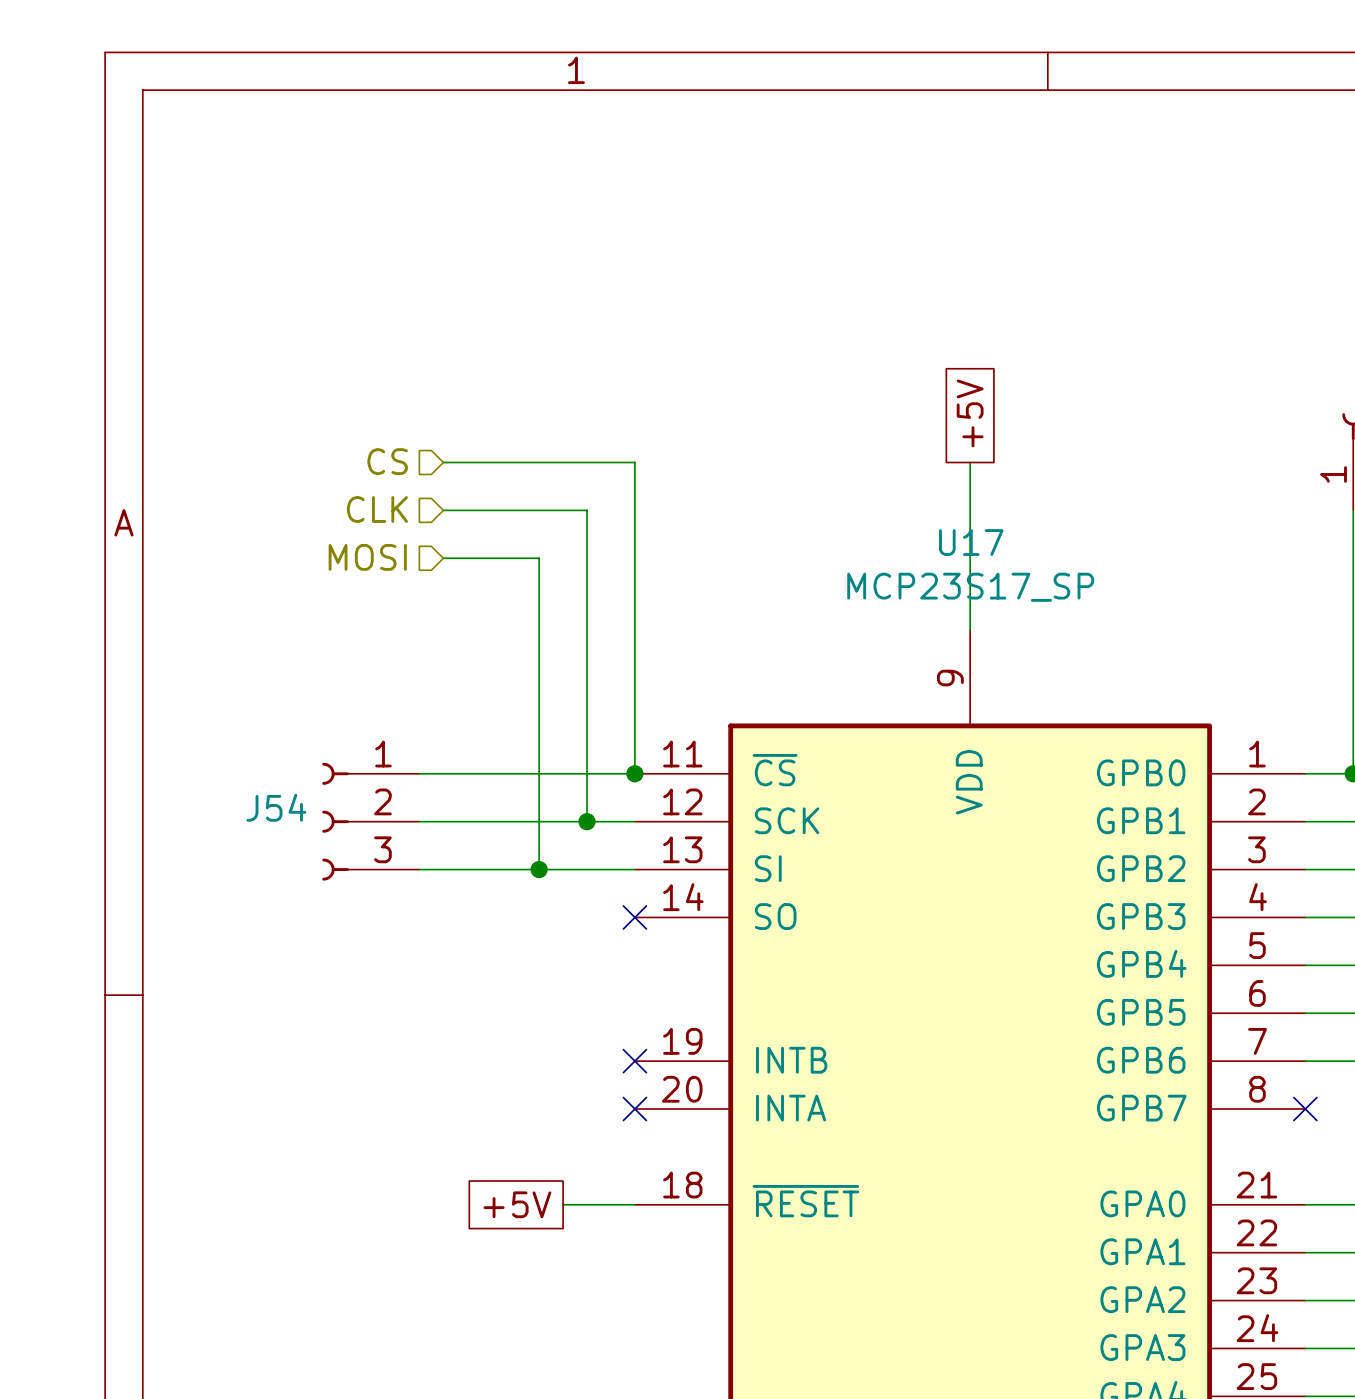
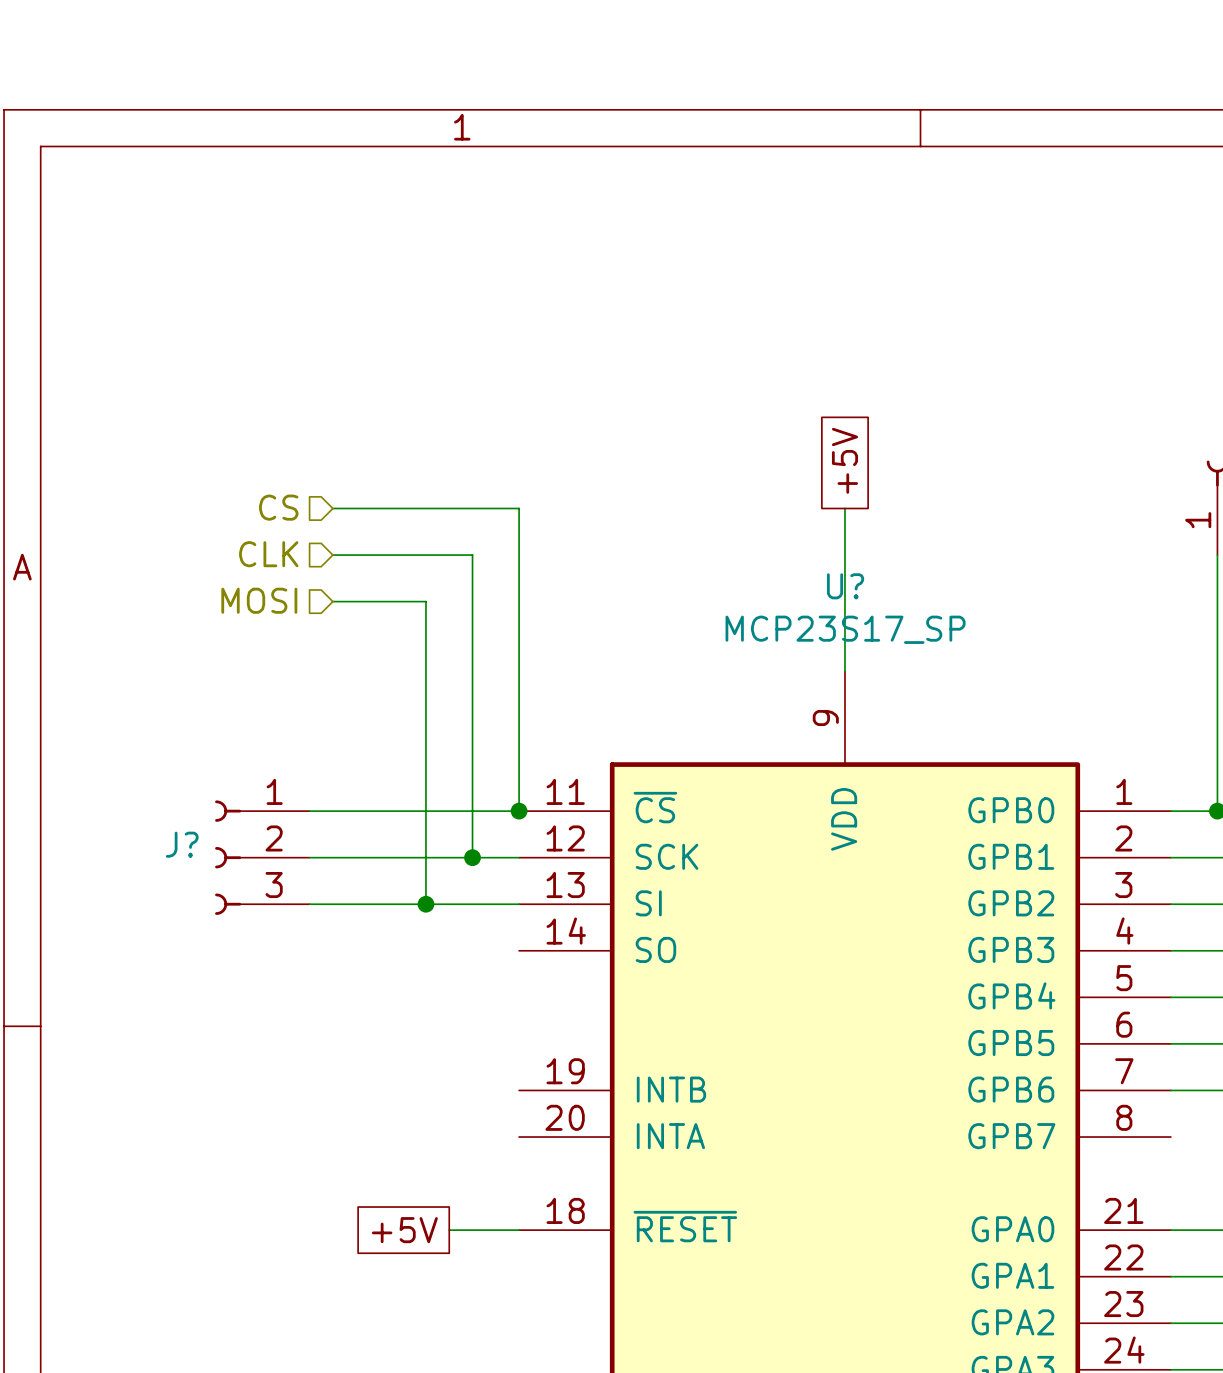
U17 name: U17 (971, 542) -> U? (845, 586)
J54 name: J54 (276, 807) -> J? (182, 844)
no-connect mark: (634, 917) -> none
no-connect mark: (634, 1061) -> none
no-connect mark: (634, 1109) -> none
no-connect mark: (1305, 1109) -> none

